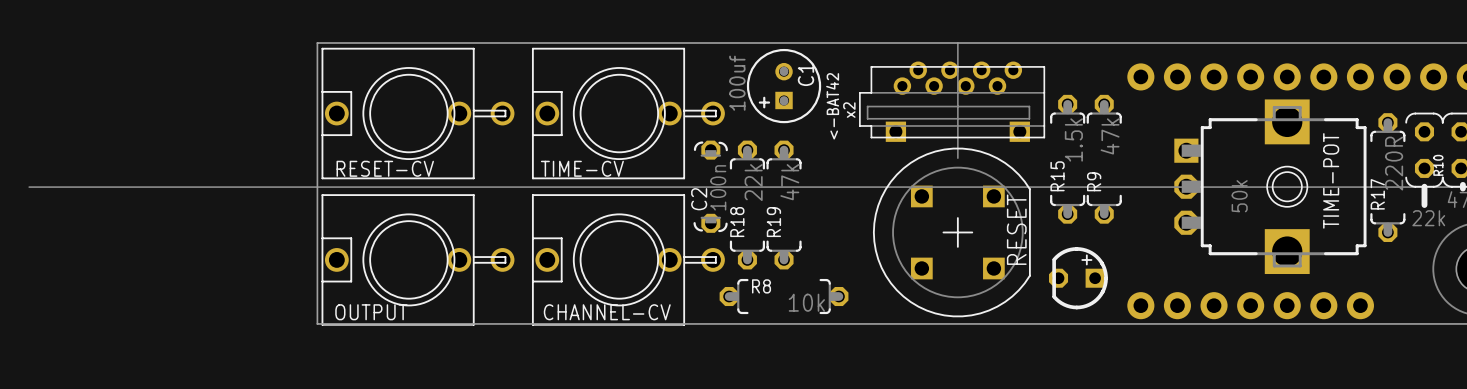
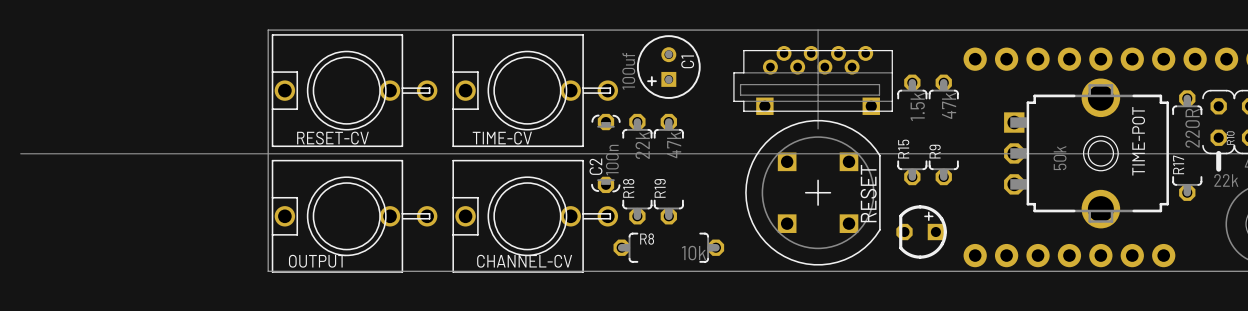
TIME-POT footprint: [1174, 99, 1367, 275] -> [1004, 78, 1169, 229]
text: <-BAT42 (832, 106) -> none
text: x2 (849, 110) -> none

